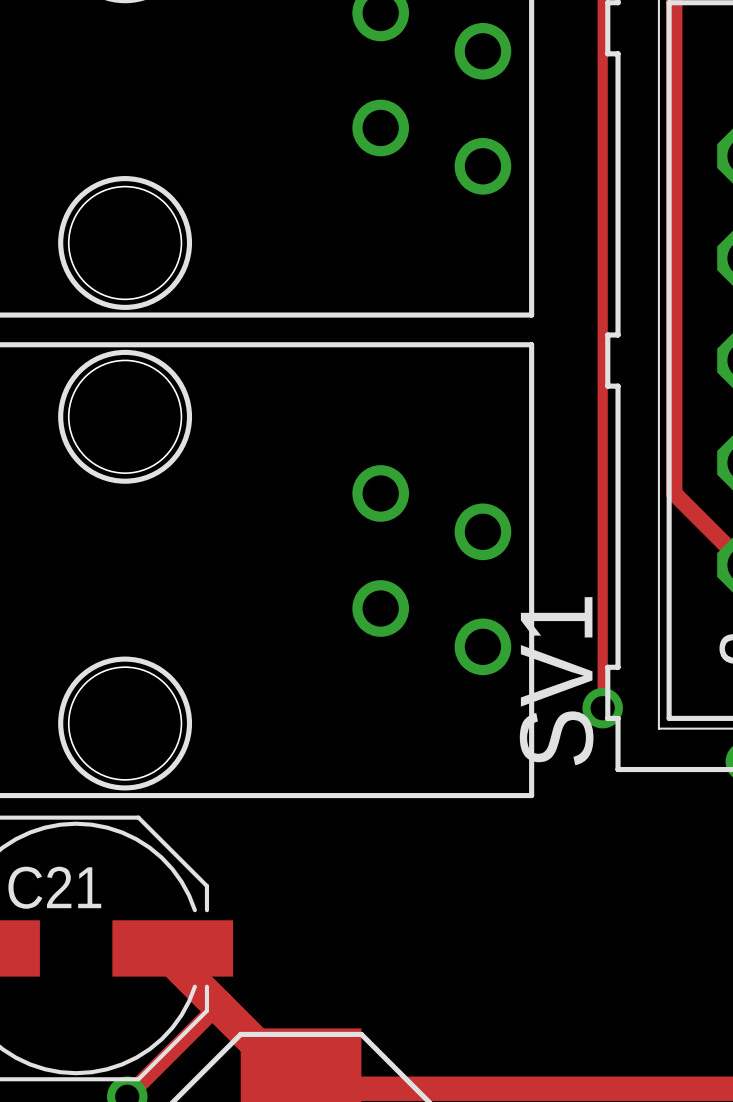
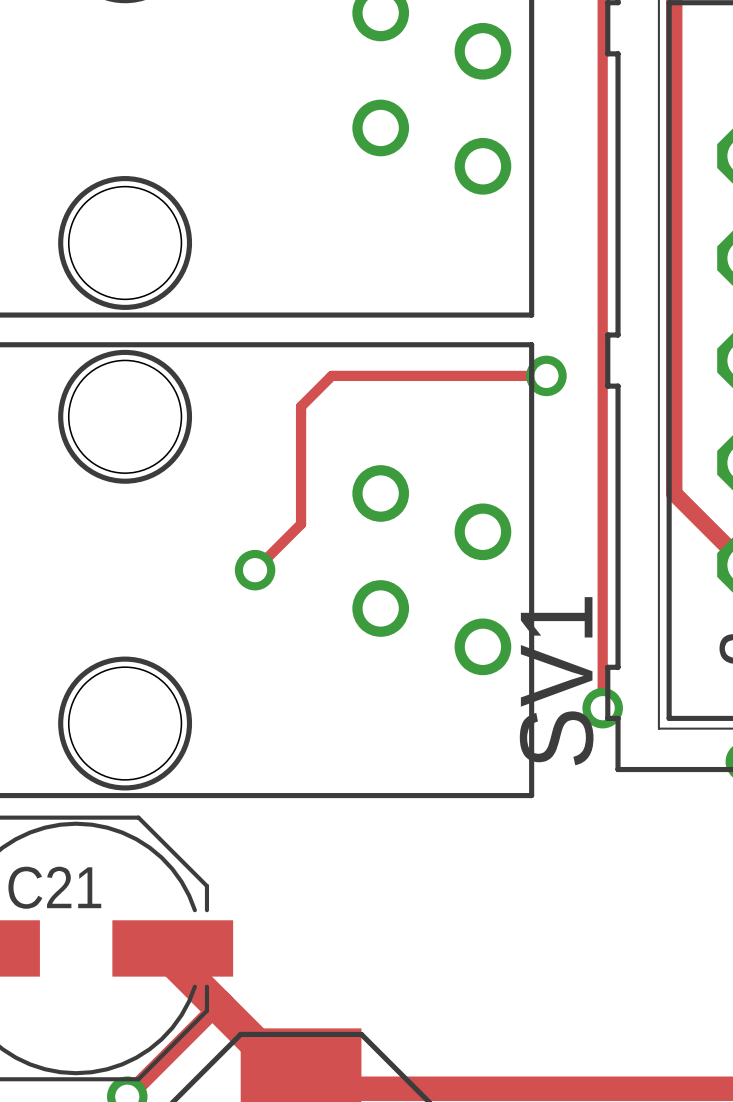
track: none -> (546, 375) (331, 375) (301, 406) (301, 524) (255, 570)
via: none -> (546, 375)
via: none -> (255, 570)

